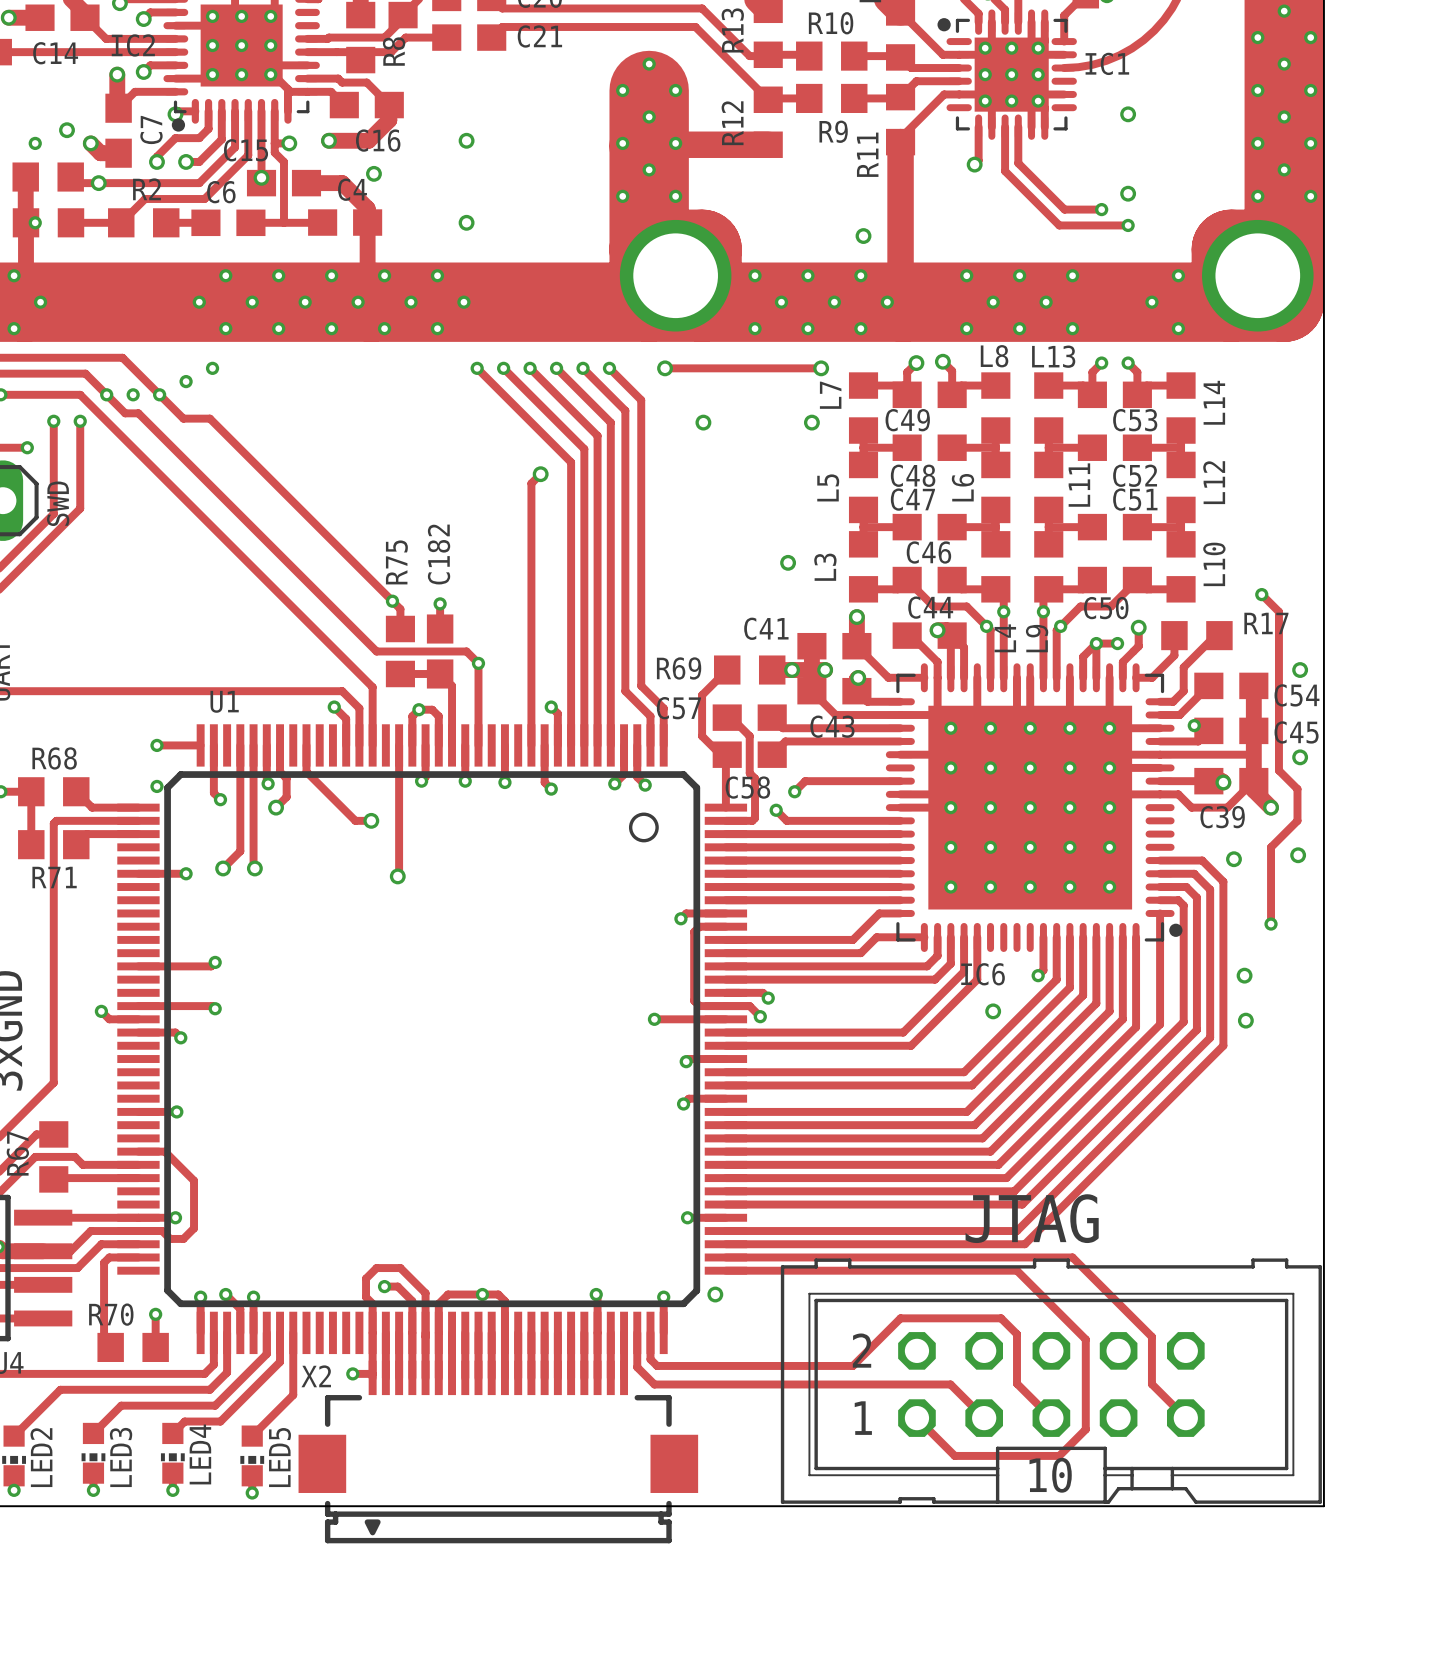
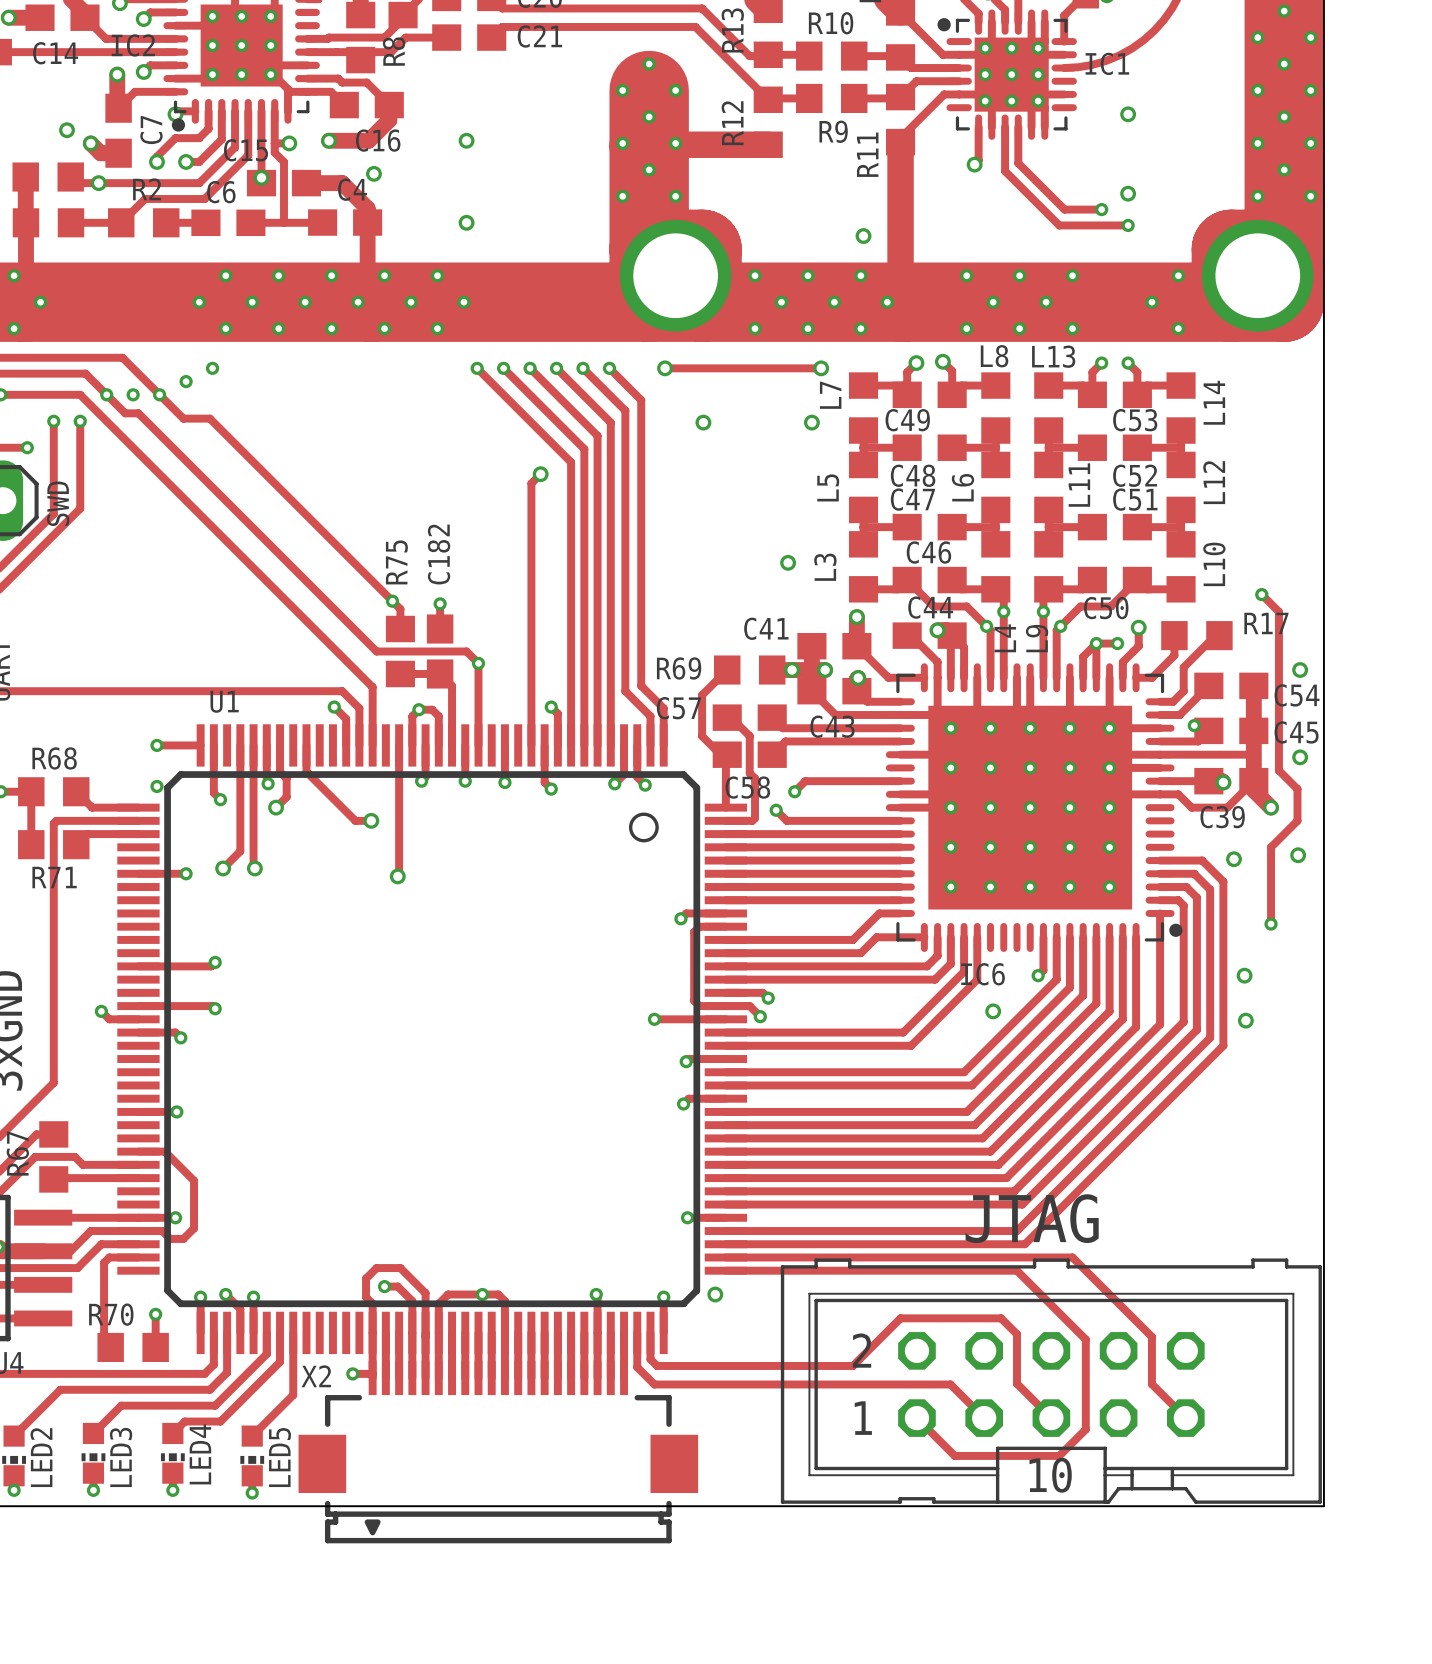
via: (35, 143) -> none
via: (35, 222) -> none

